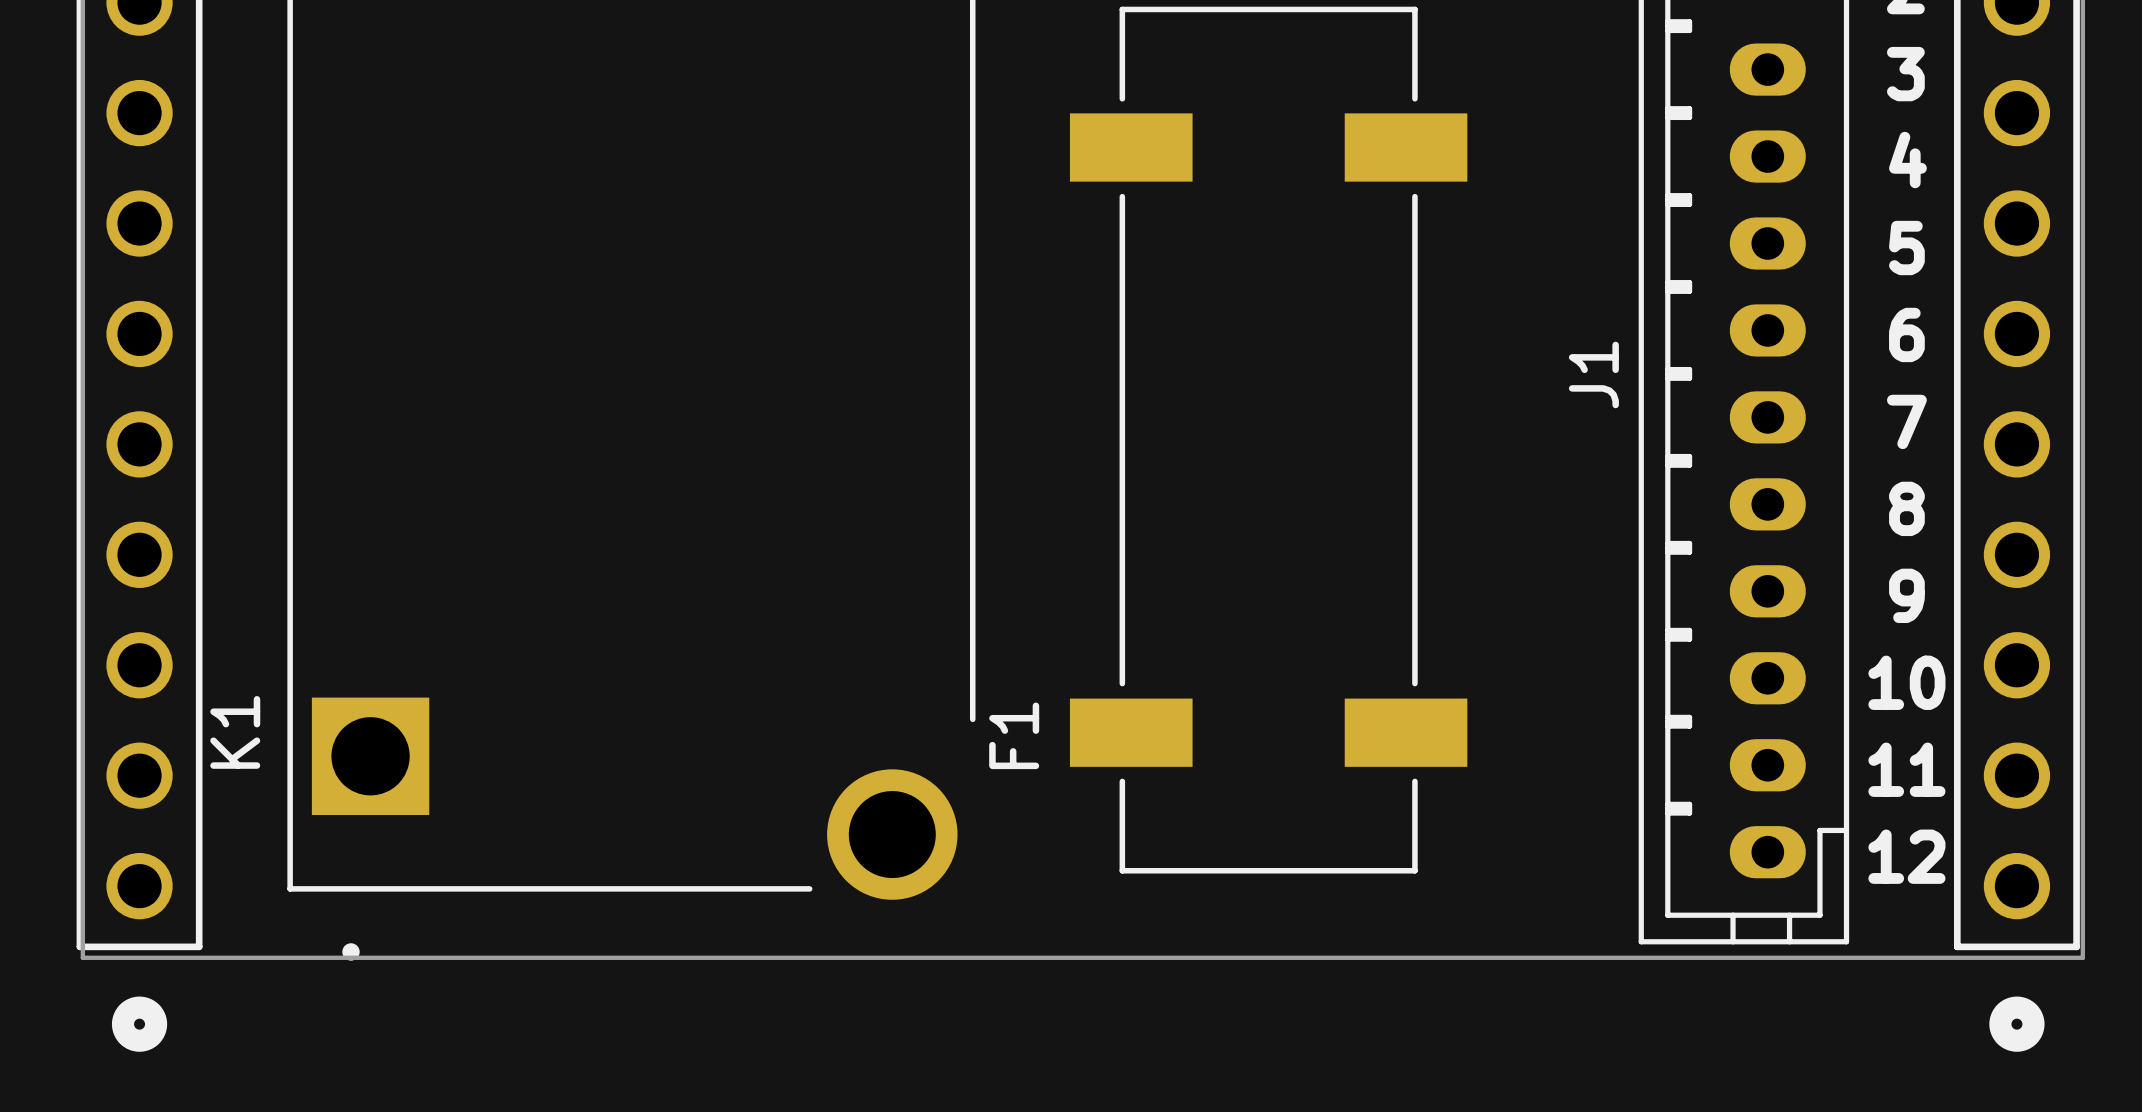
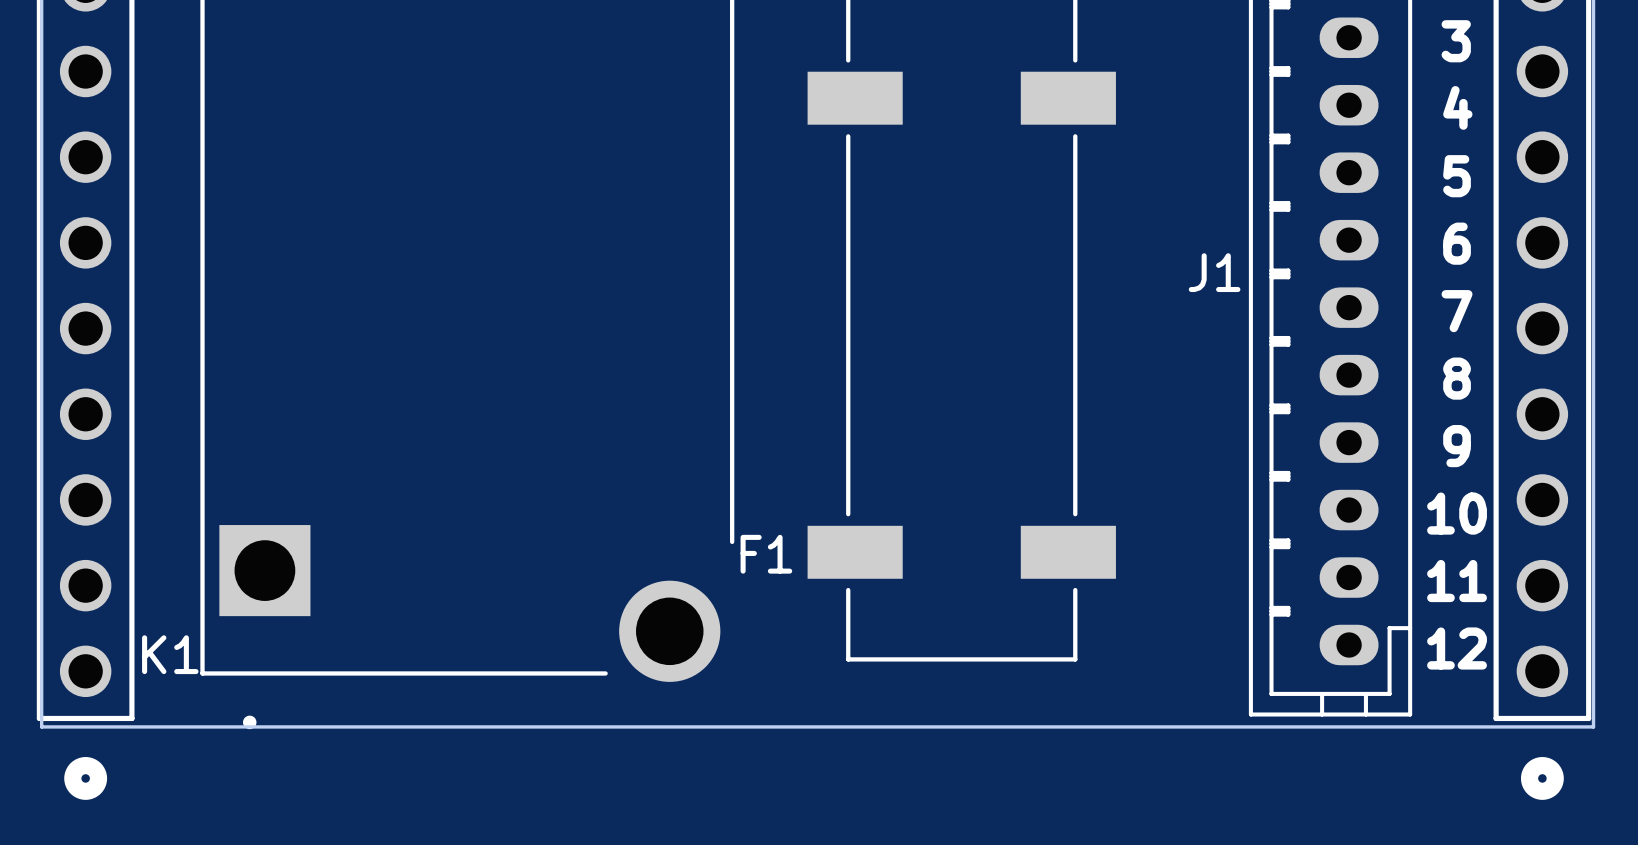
J1 name rotation: 0° (1593, 374) -> 90° clockwise (1214, 272)
K1 name rotation: 0° (235, 732) -> 90° clockwise (170, 654)
K1 name position: K1 (235, 732) -> K1 (170, 654)
F1 name rotation: 0° (1014, 735) -> 90° clockwise (766, 554)

